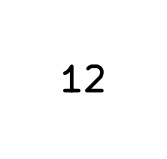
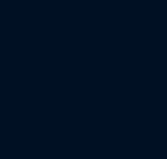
drawing: [63, 64, 104, 93] -> none

